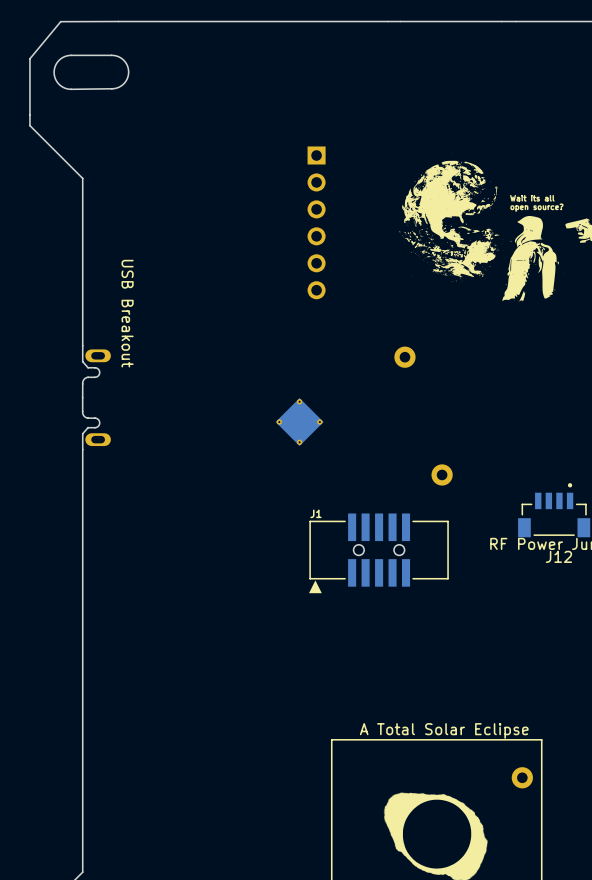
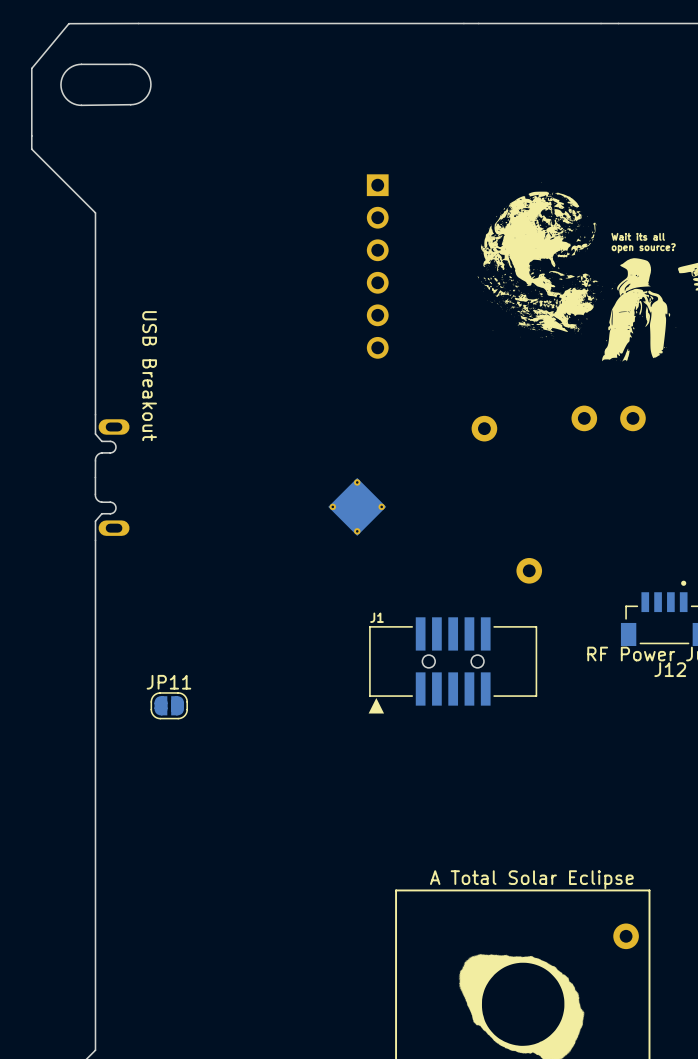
part: none -> (584, 418)
part: none -> (632, 418)
JP11: none -> (169, 705)

